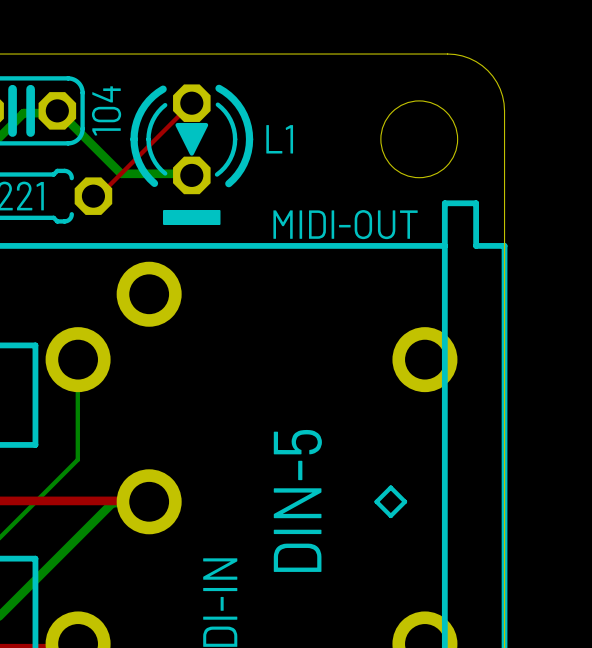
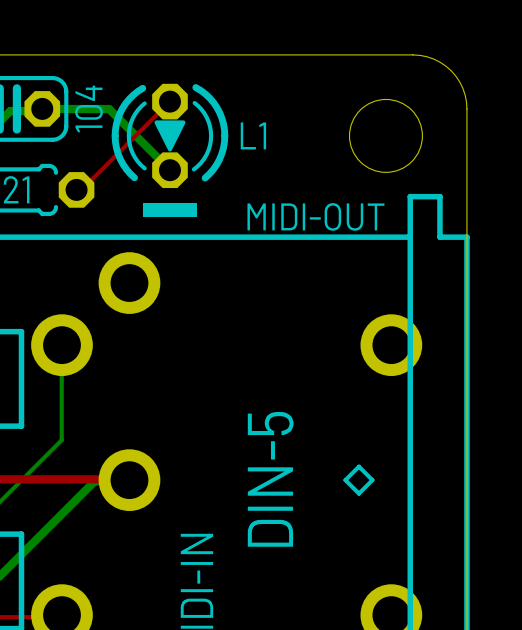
bottom track: (58, 110) (121, 173) (190, 173) -> (43, 109) (109, 109) (168, 168)

